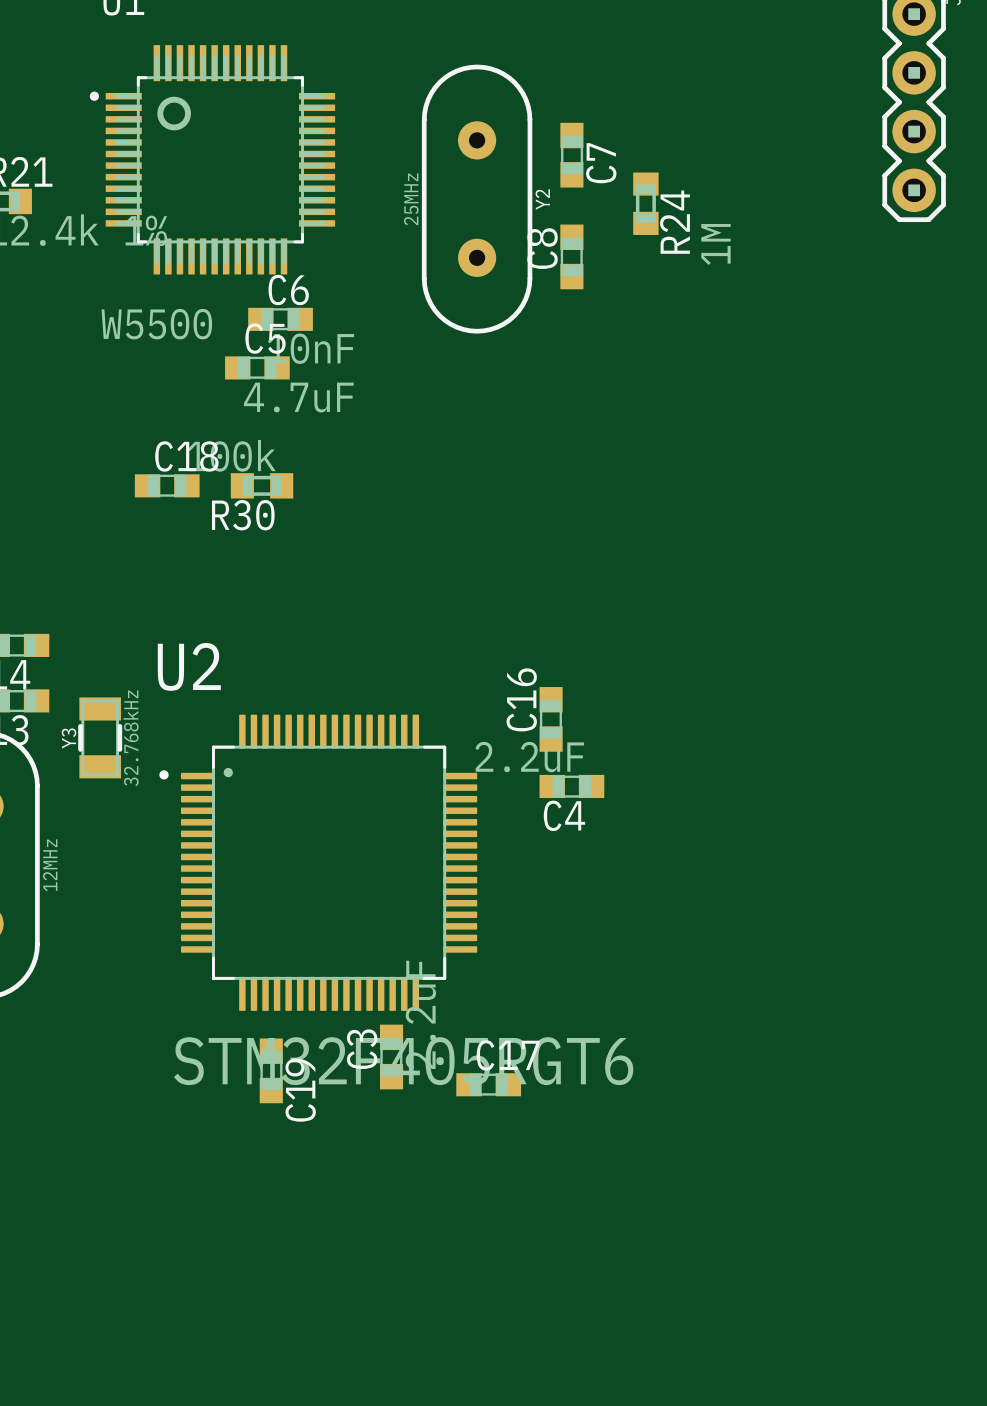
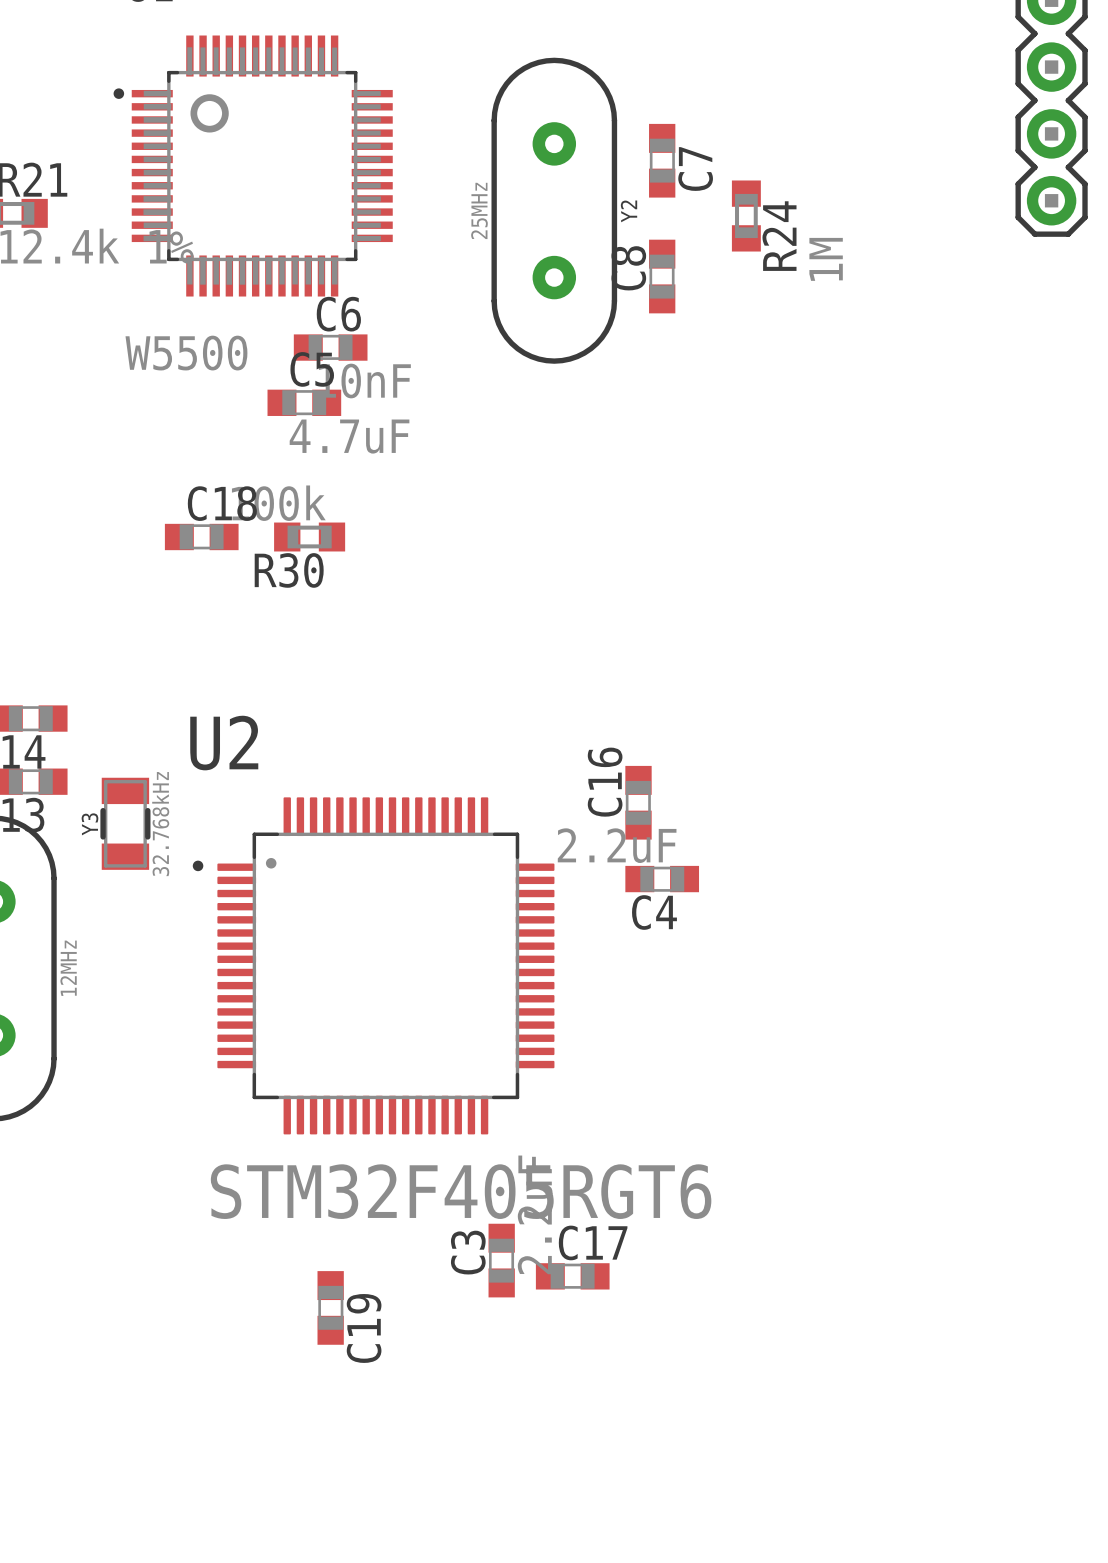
C3 position: (391, 1057) -> (501, 1260)
C19 position: (271, 1070) -> (330, 1307)
C17 position: (488, 1084) -> (572, 1276)

